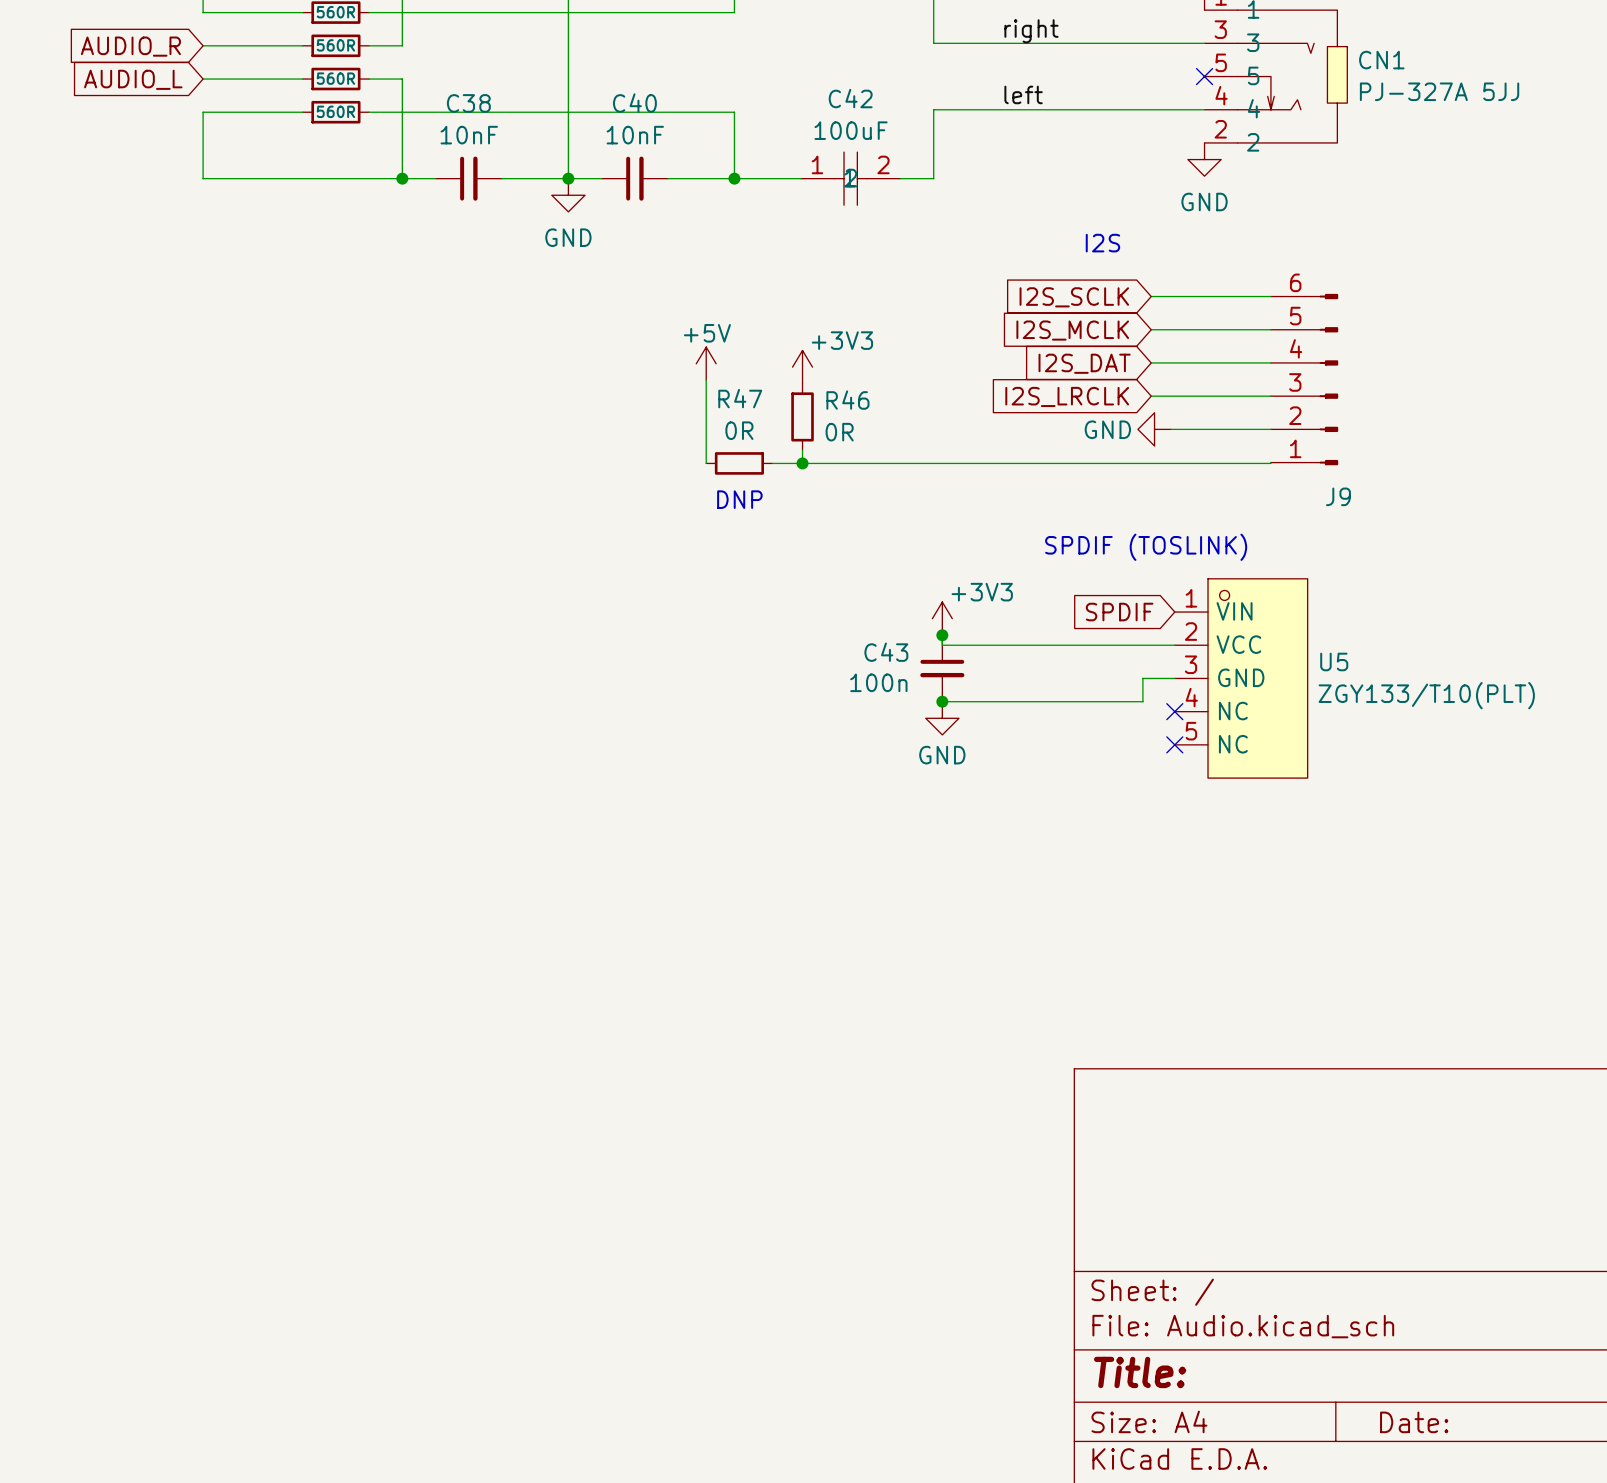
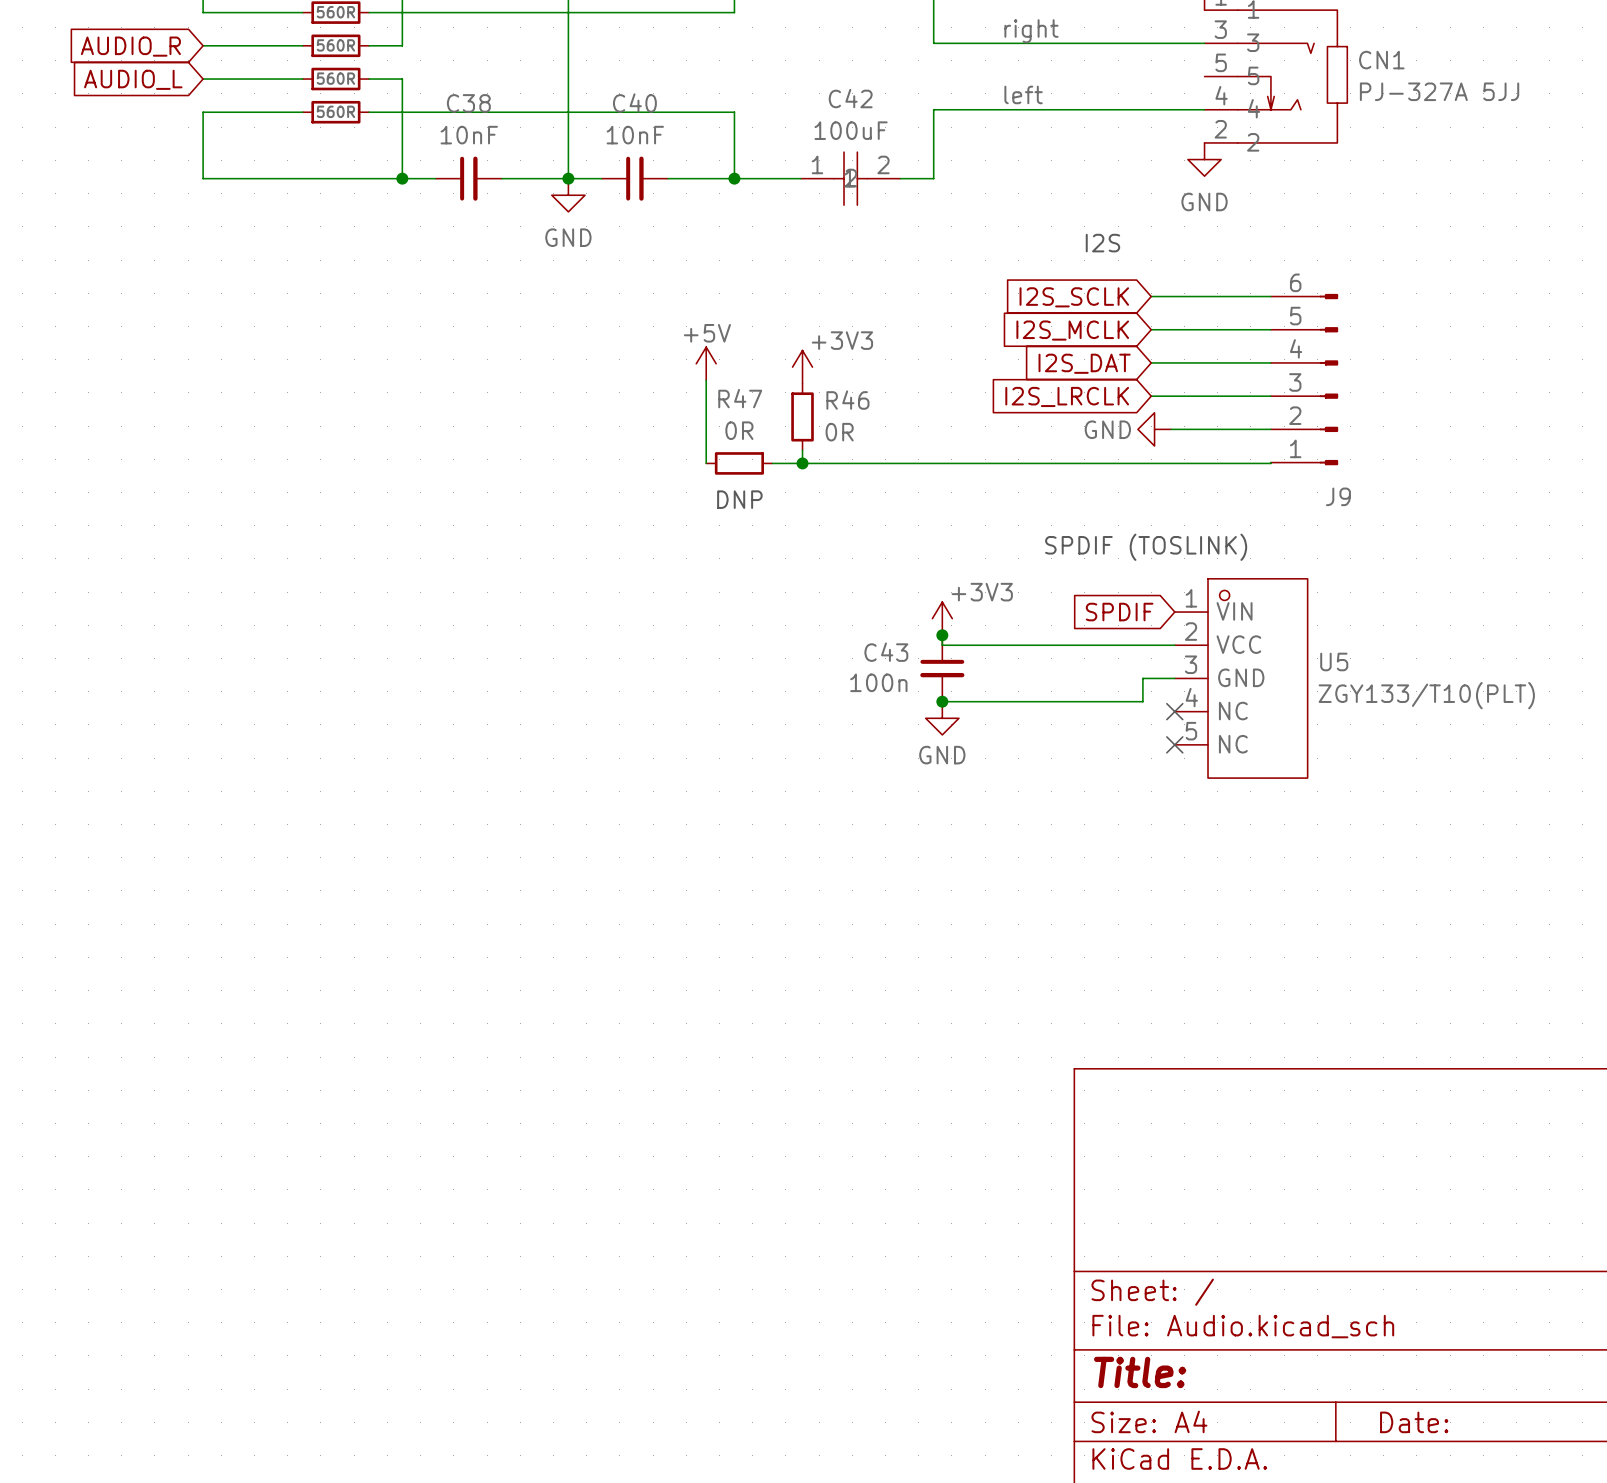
no-connect mark: (1204, 76) -> none

